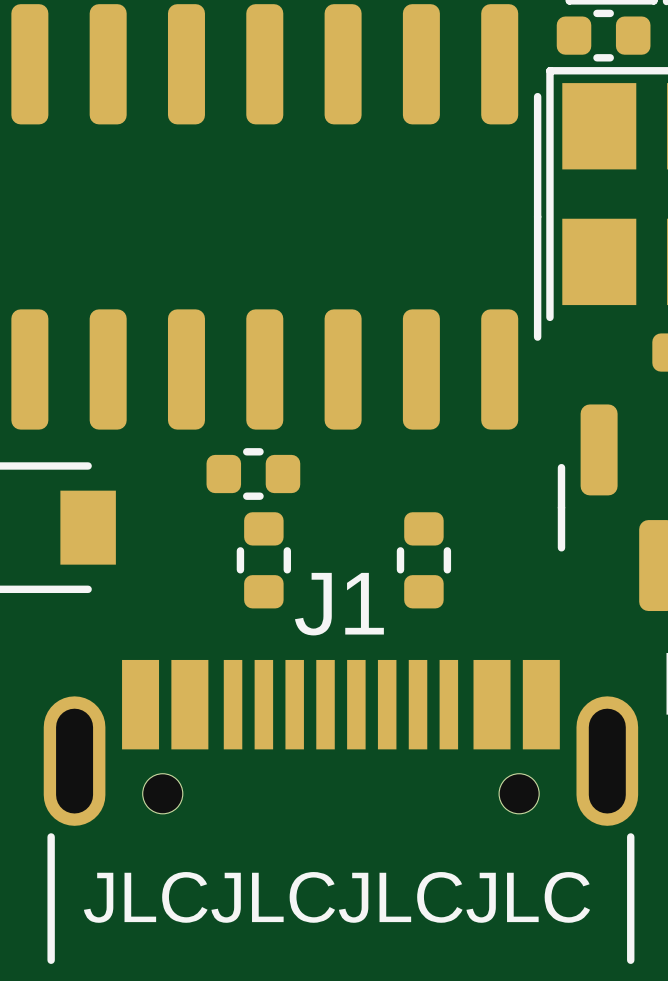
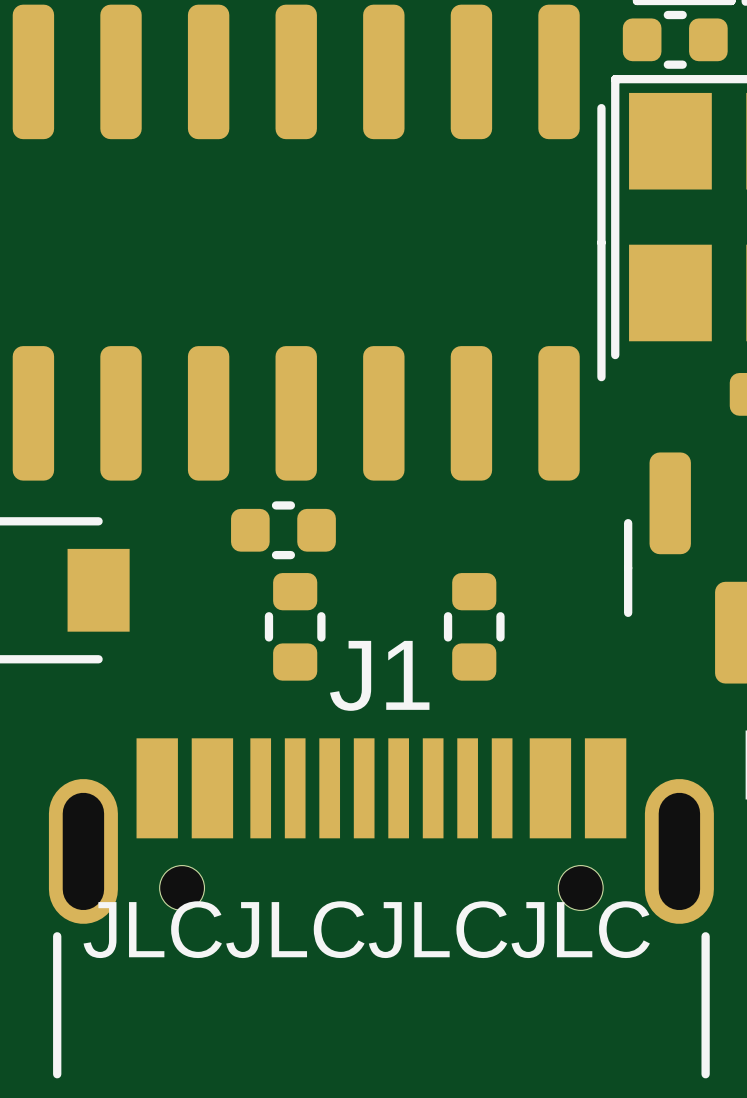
text position: JLCJLCJLCJLC (336, 897) -> JLCJLCJLCJLC (366, 929)

